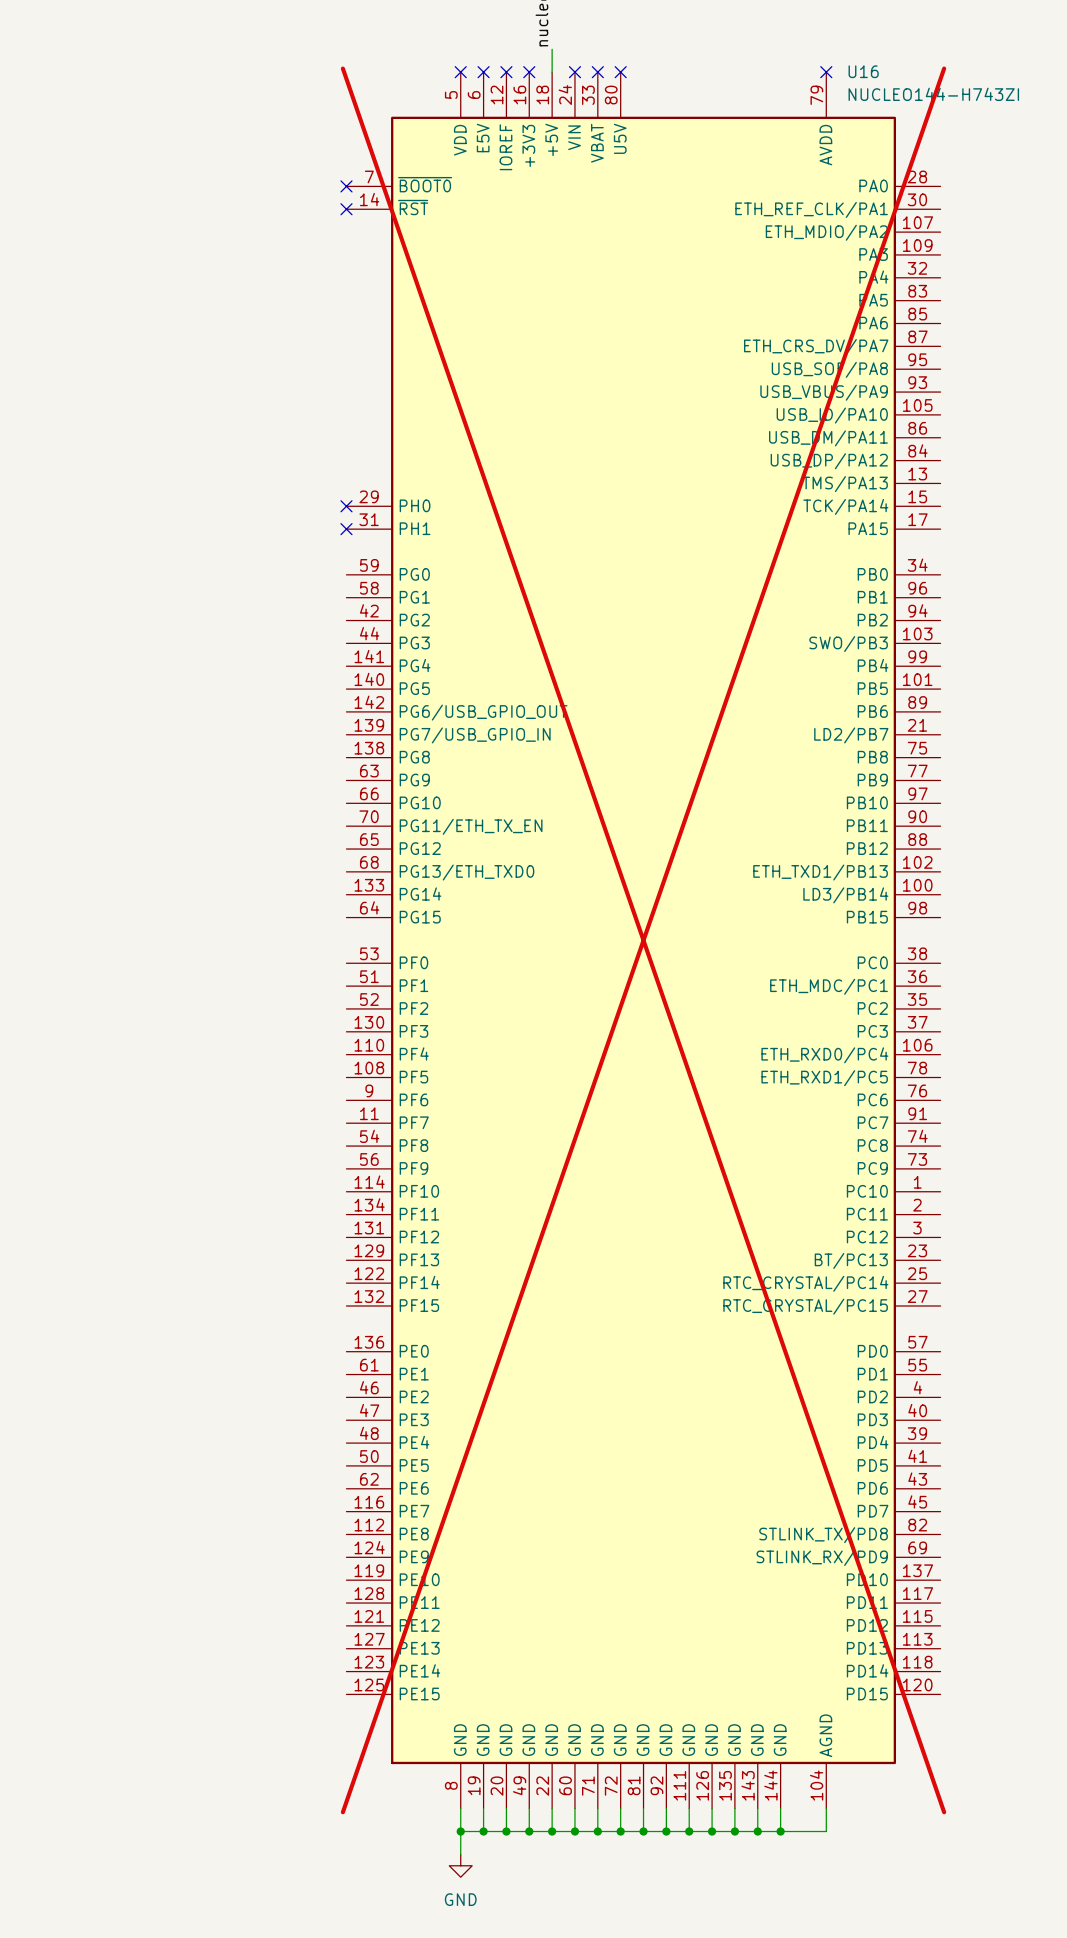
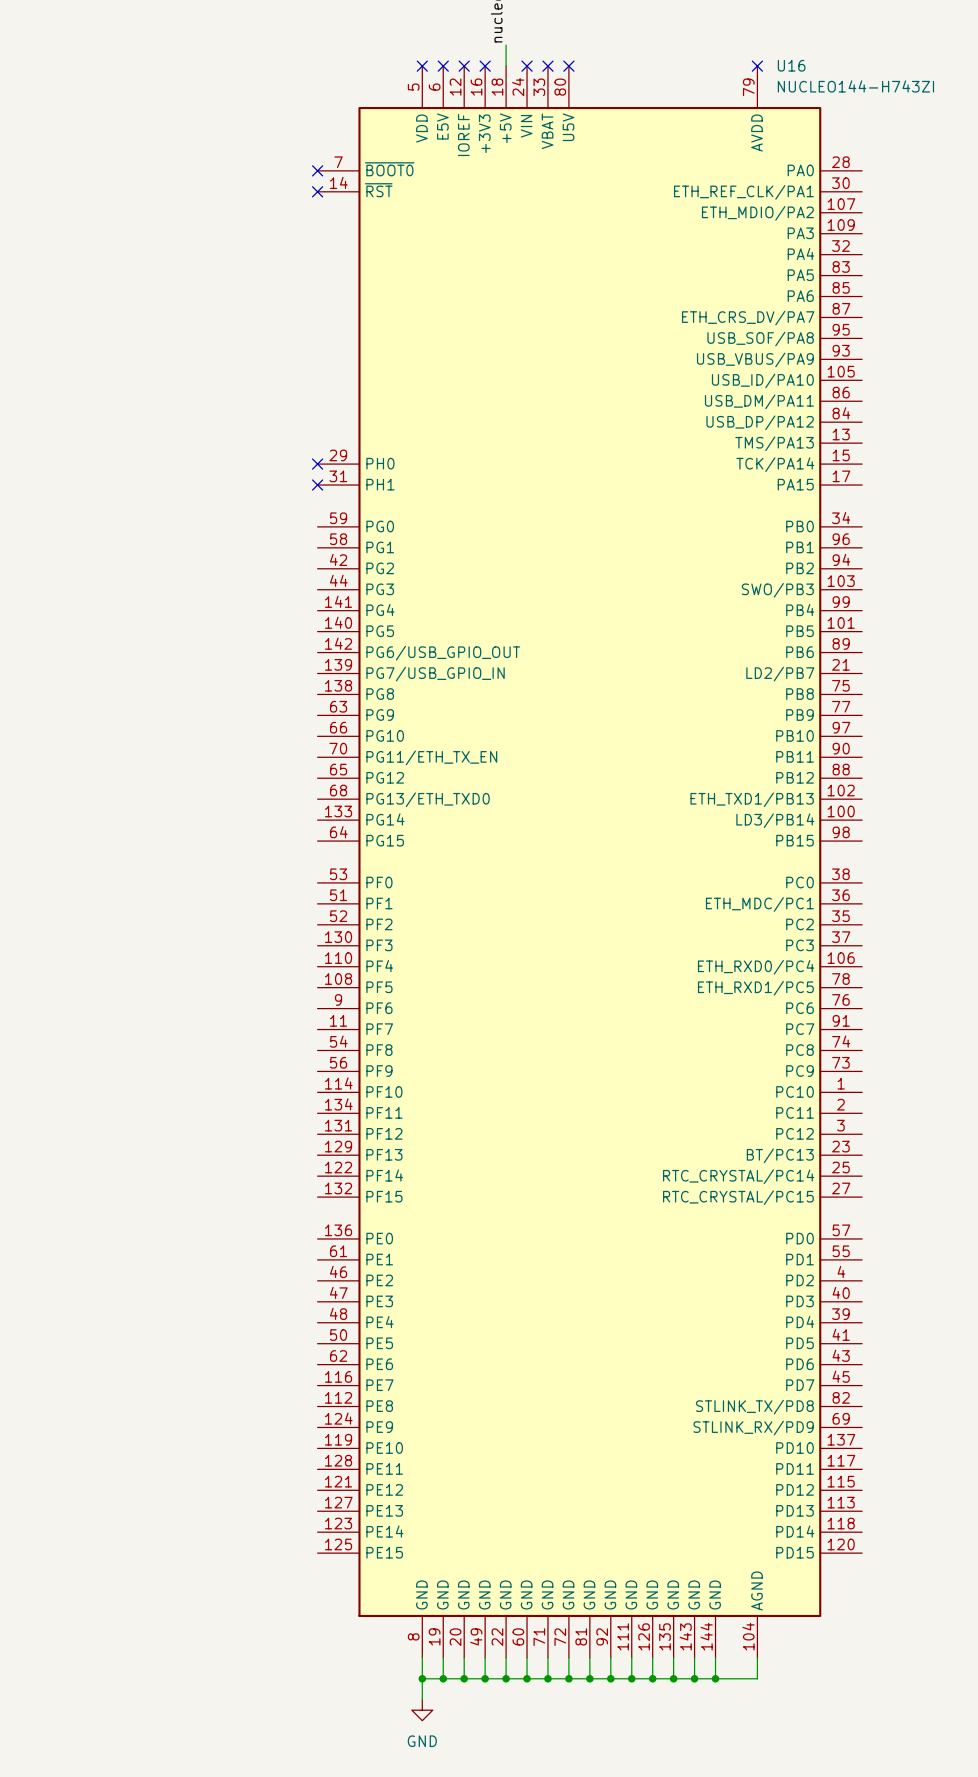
U16 do-not-place cross: (643, 940) -> none

